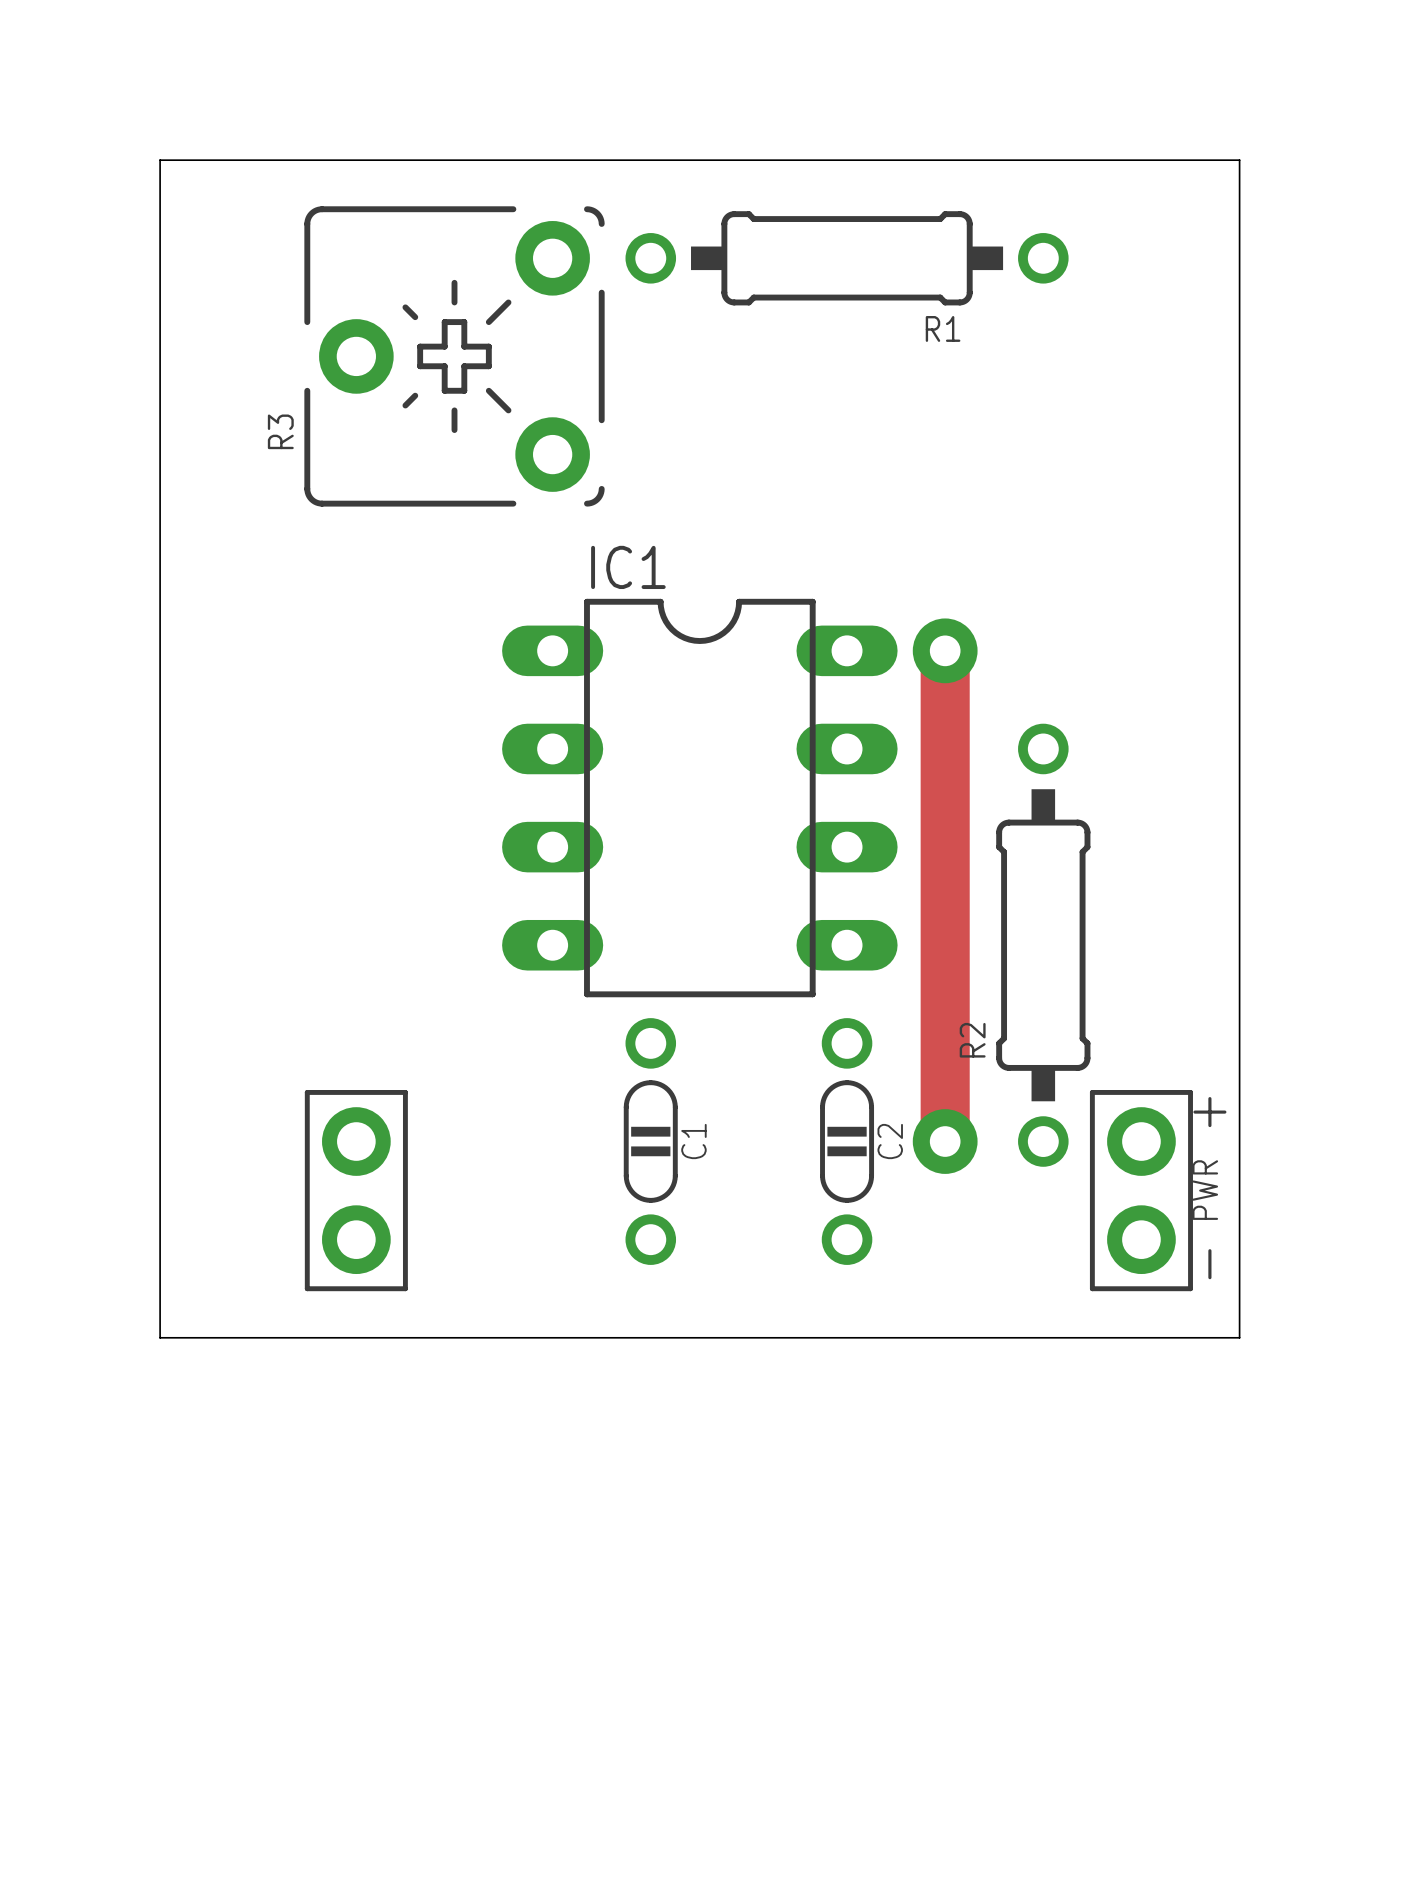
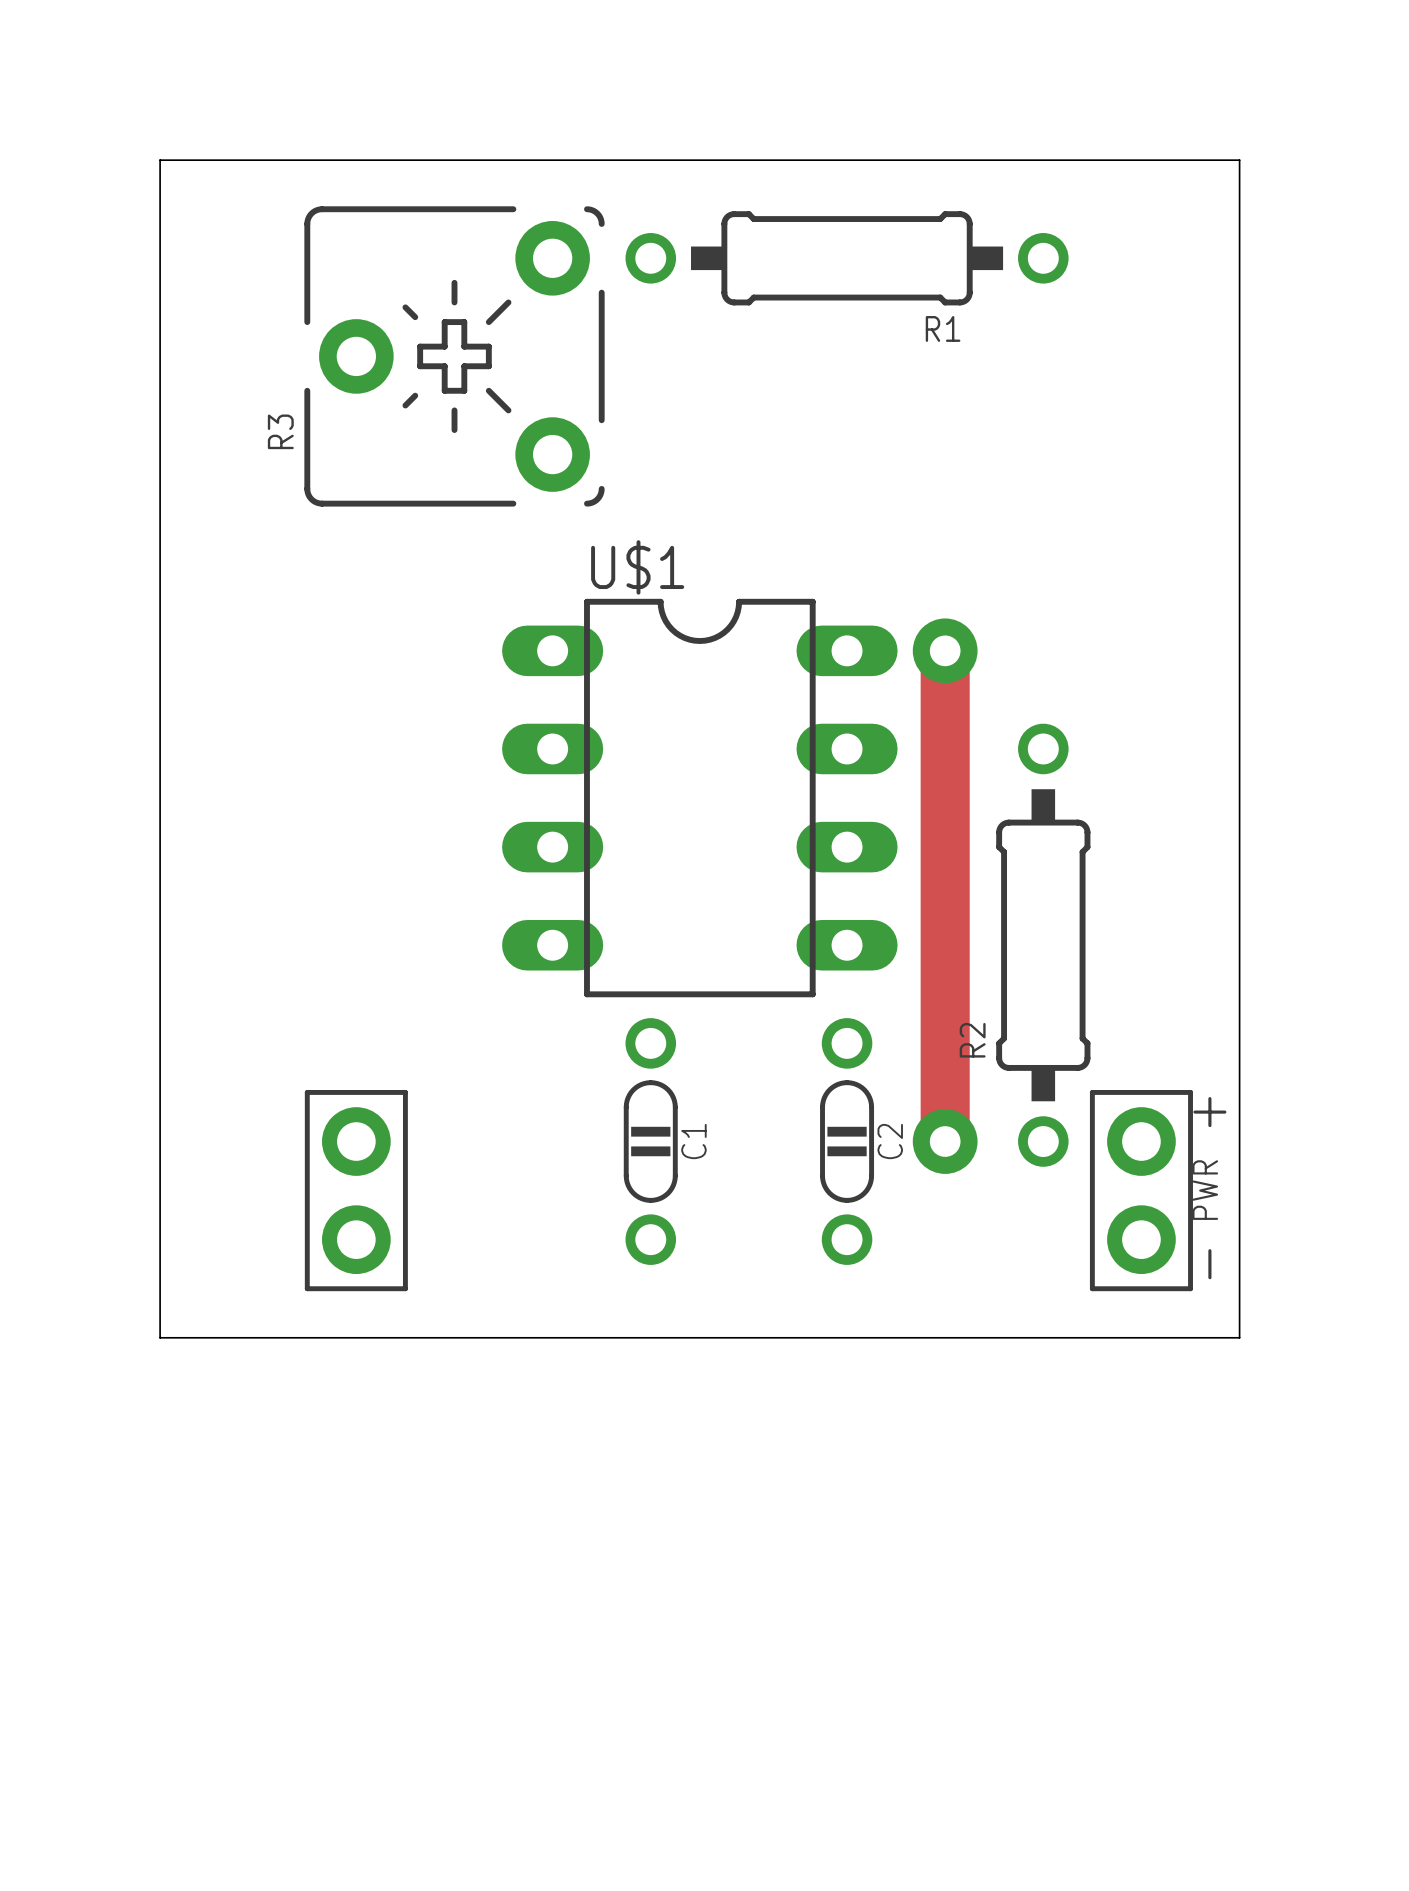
IC1 name: IC1 (628, 567) -> U$1 (637, 567)

